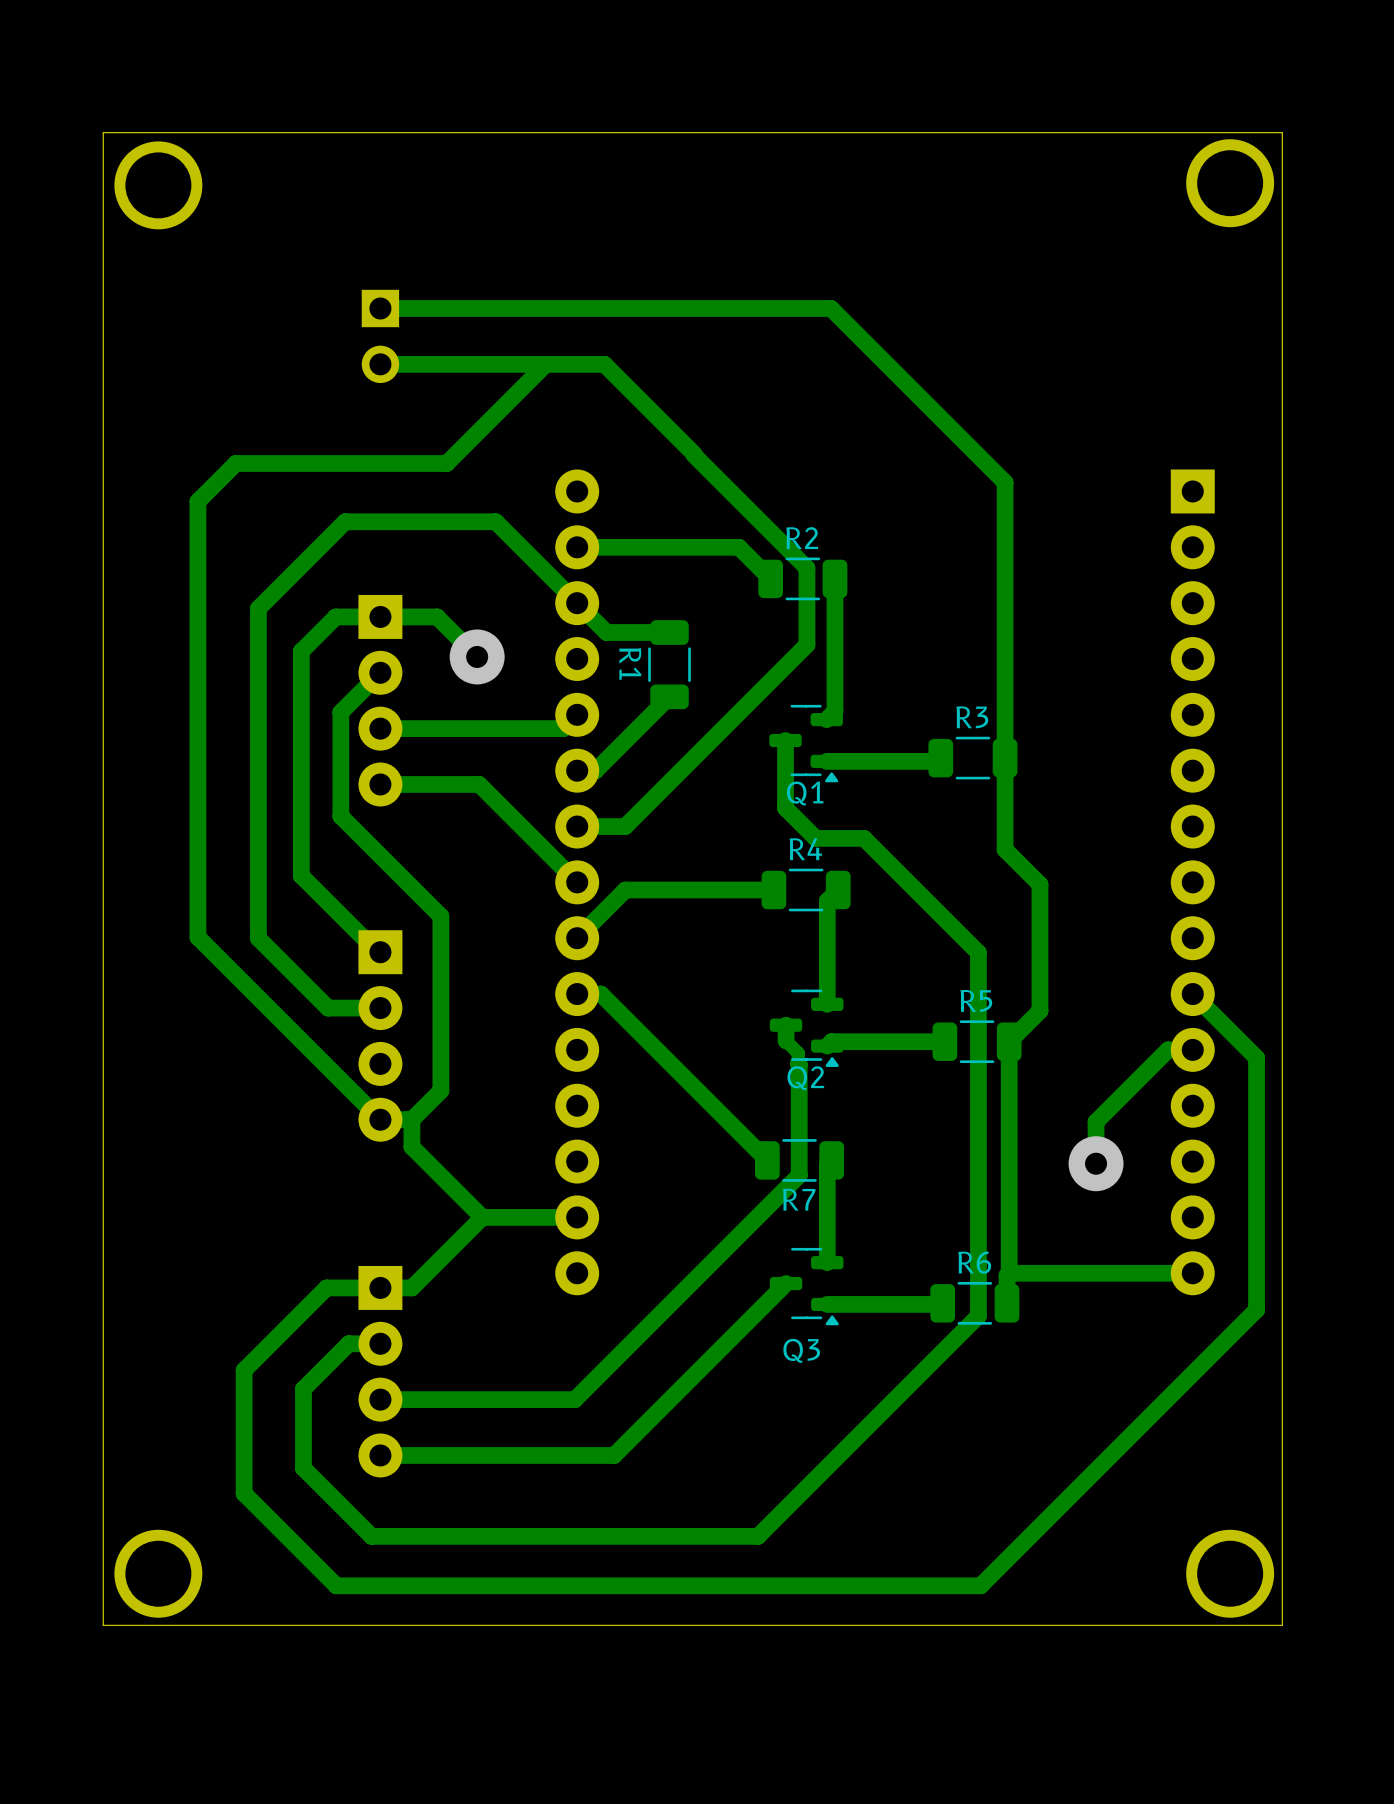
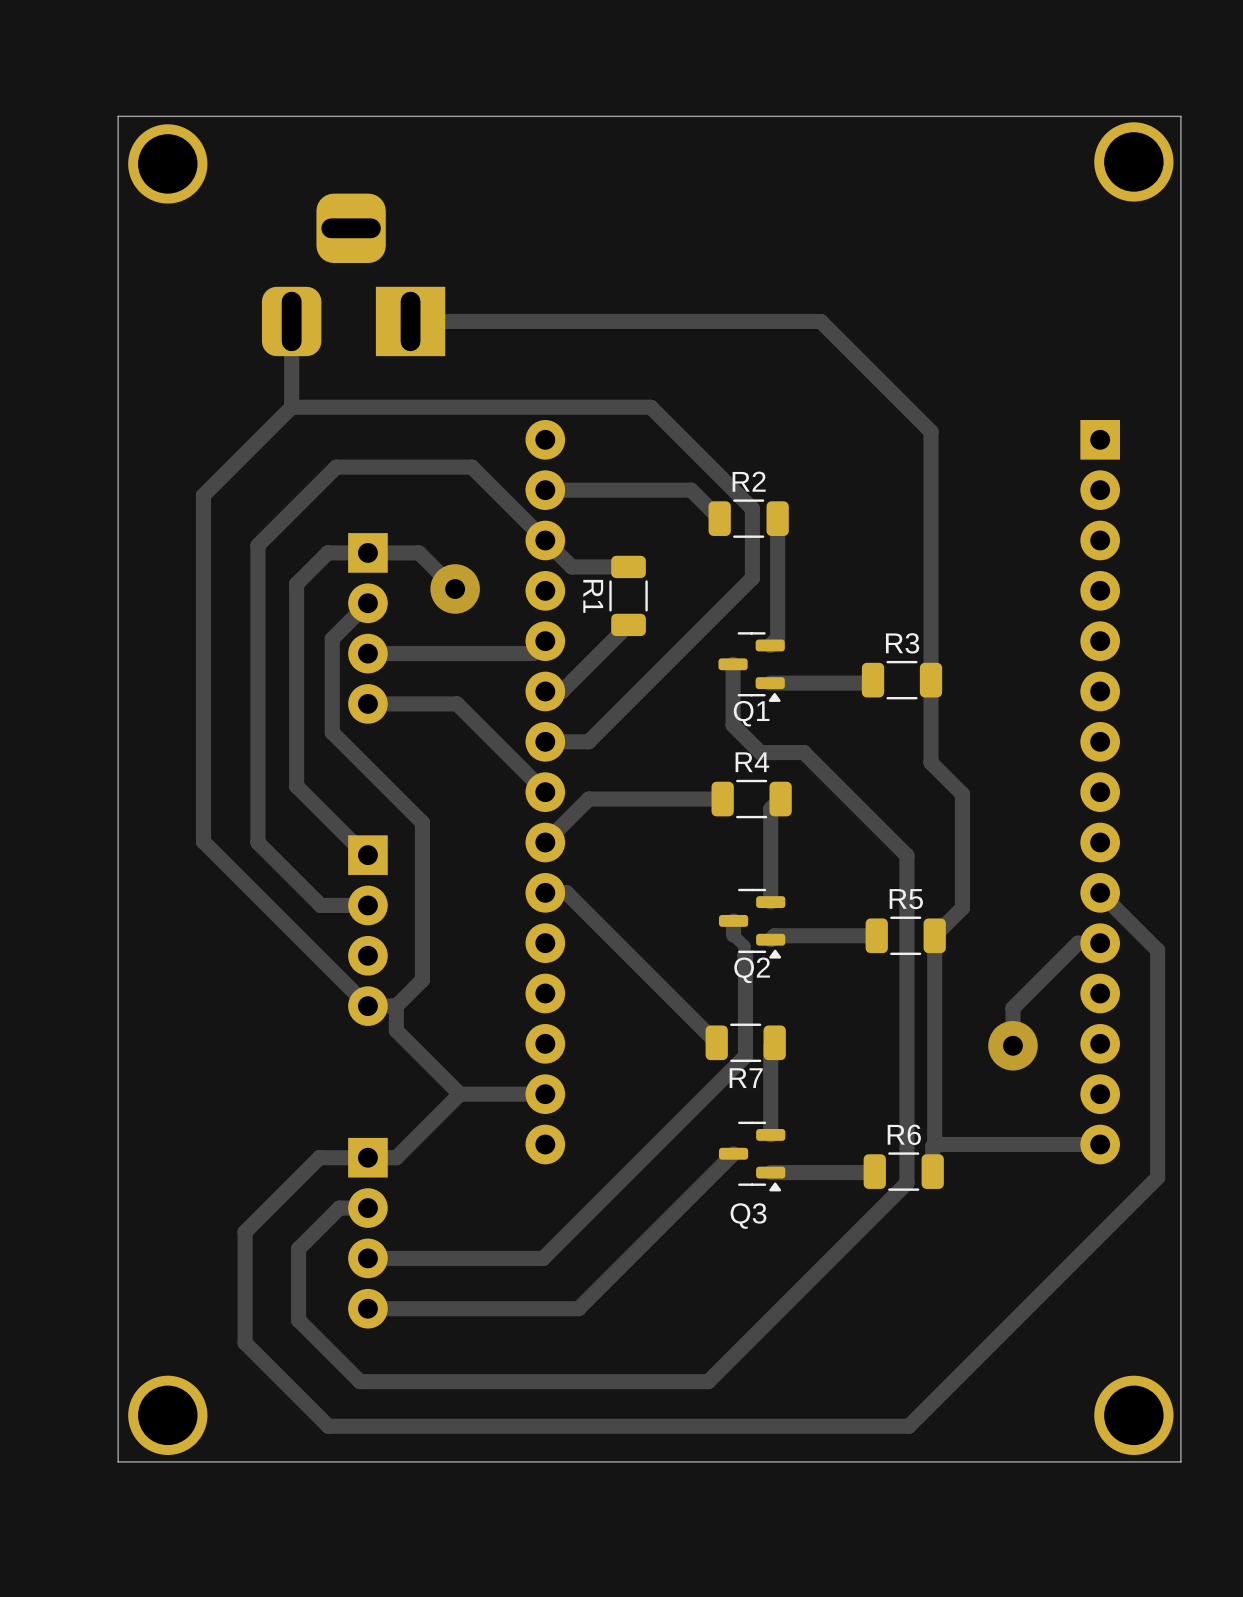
part: none -> (353, 274)
track: (380, 308) (831, 308) (882, 360) -> (410, 321) (820, 321)
part: (380, 336) -> none
track: none -> (291, 321) (291, 407)
track: (380, 364) (604, 364) (694, 455) -> (291, 407) (650, 407)
track: (545, 364) (446, 463) (235, 463) (197, 501) (197, 553) -> (291, 407) (203, 495)

